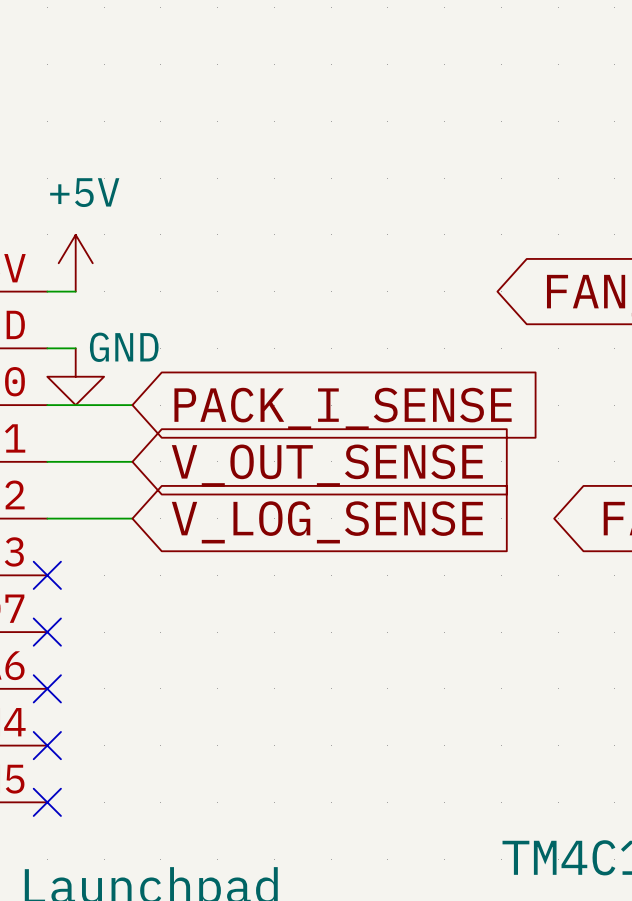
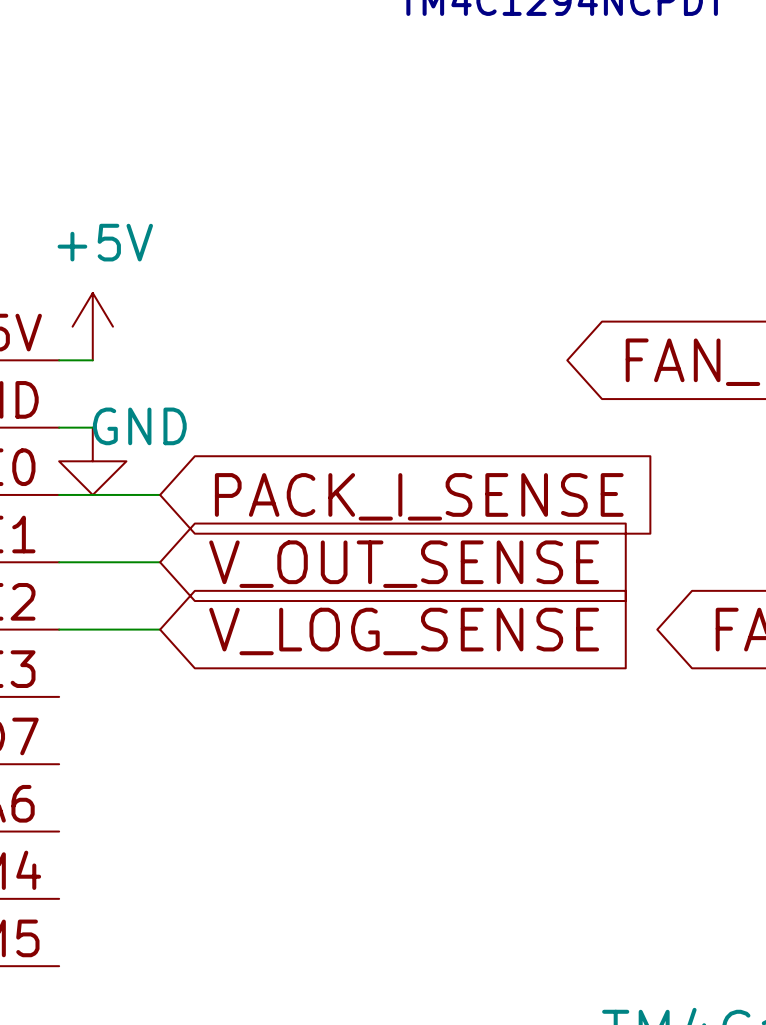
no-connect mark: (47, 575) -> none
no-connect mark: (47, 632) -> none
no-connect mark: (47, 688) -> none
no-connect mark: (47, 745) -> none
no-connect mark: (47, 802) -> none

